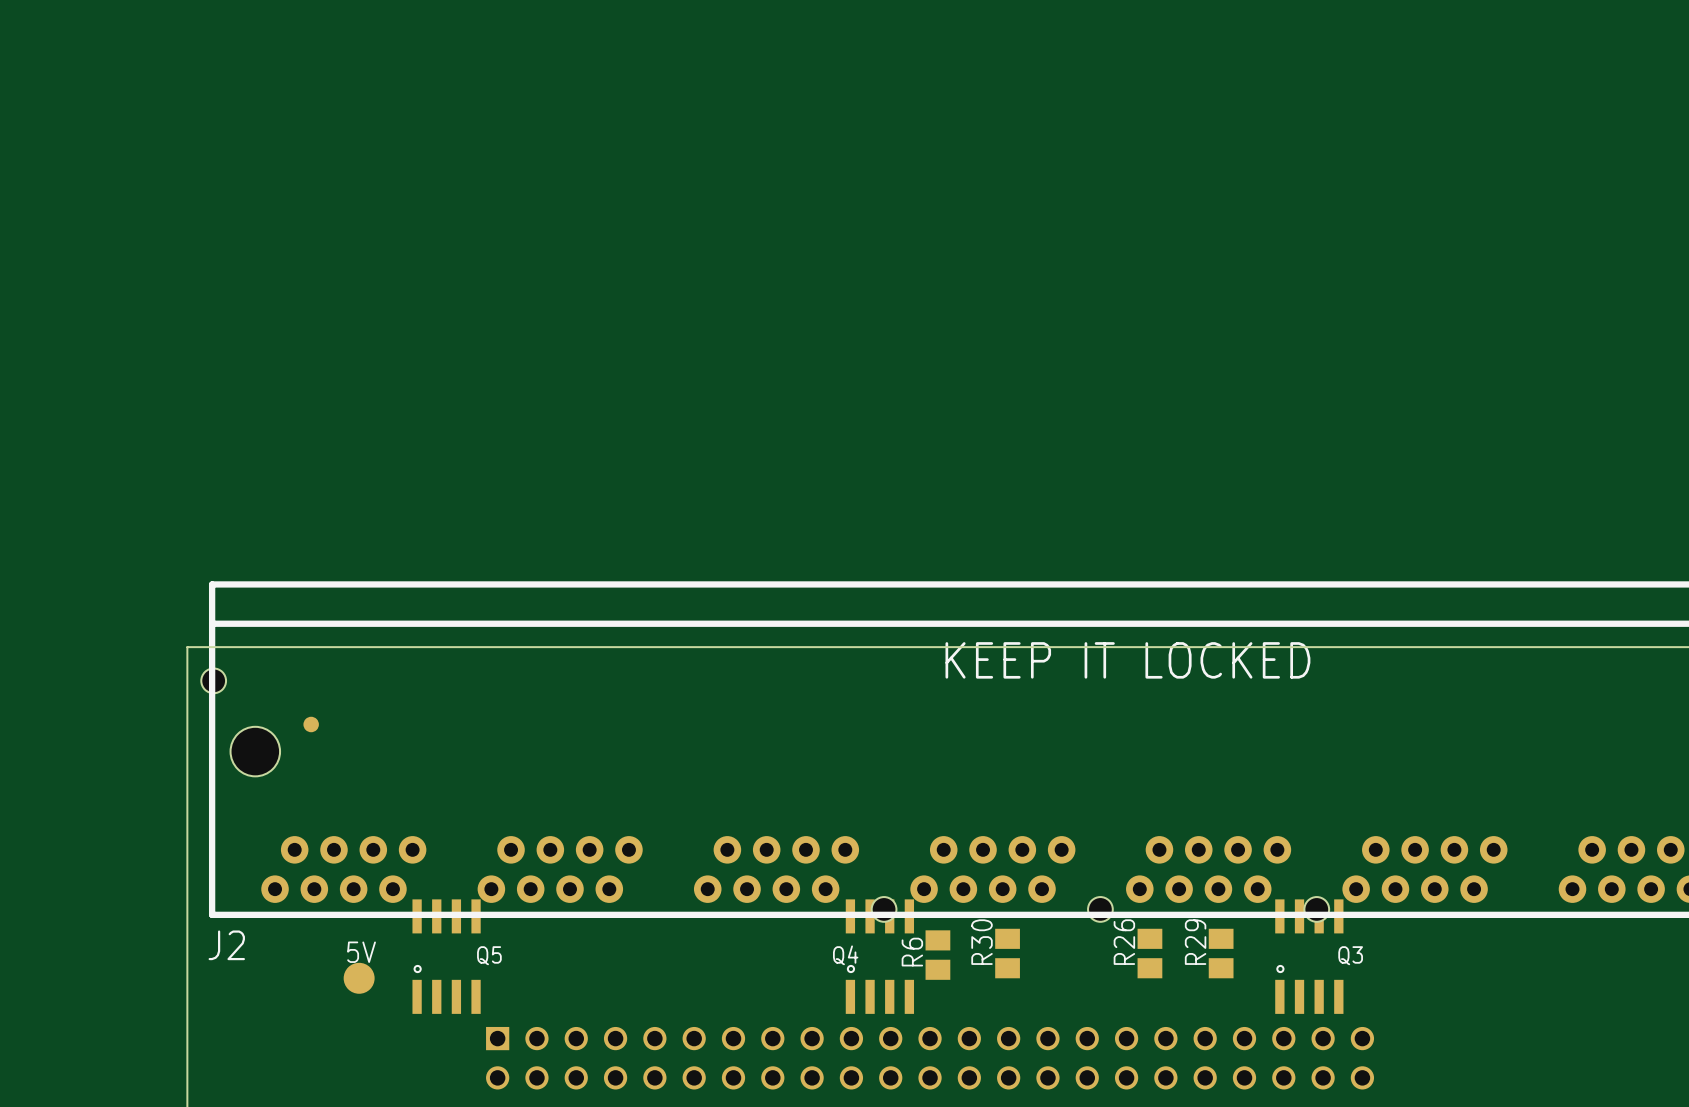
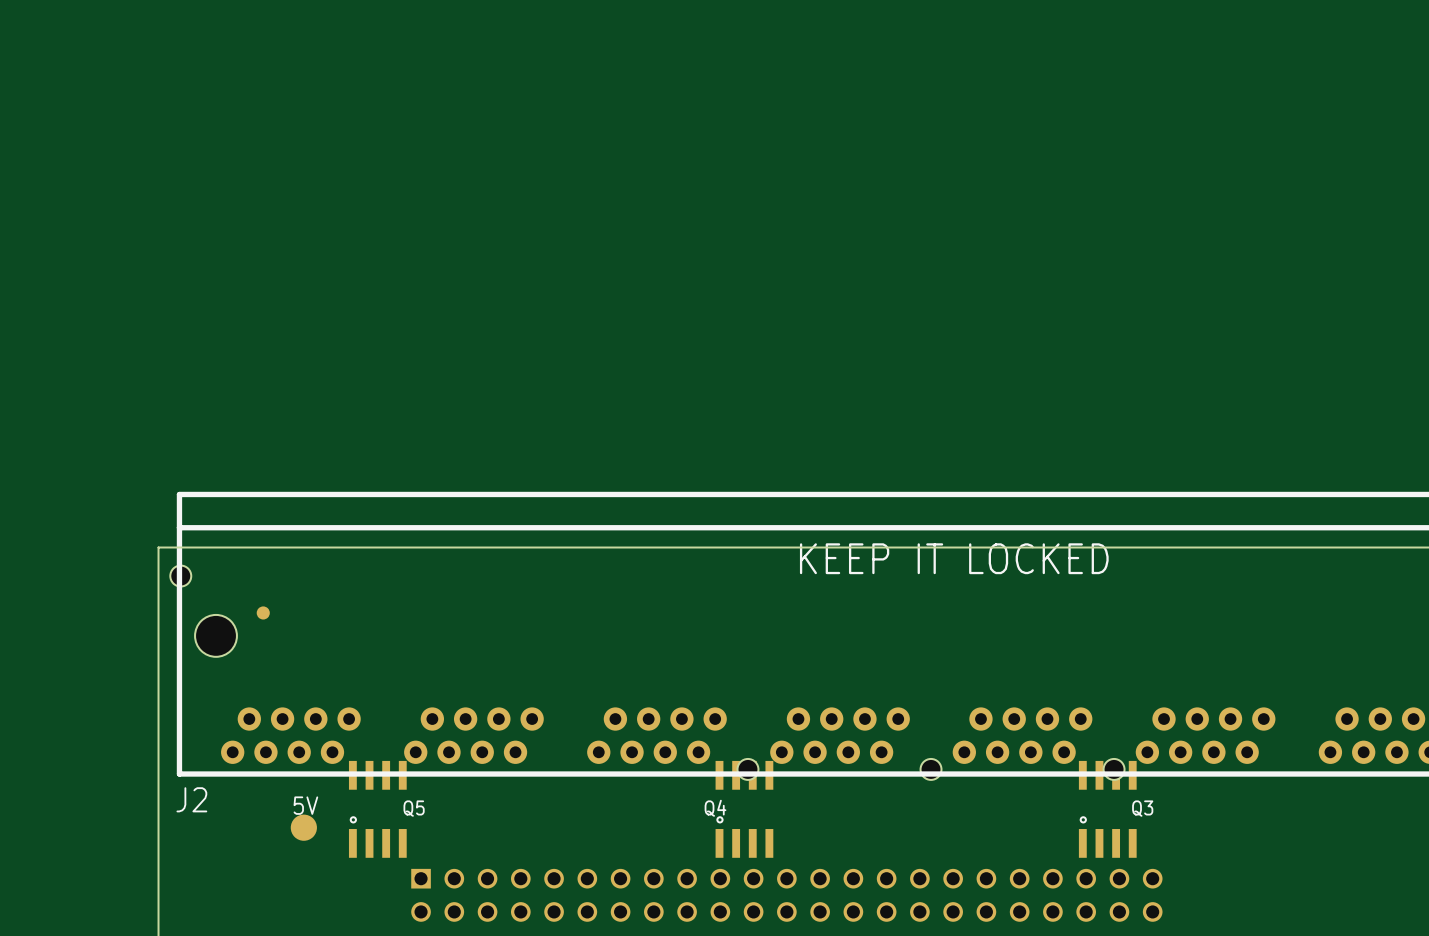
R30: (1007, 953) -> none
R26: (1149, 953) -> none
R29: (1221, 953) -> none
R6: (937, 955) -> none

